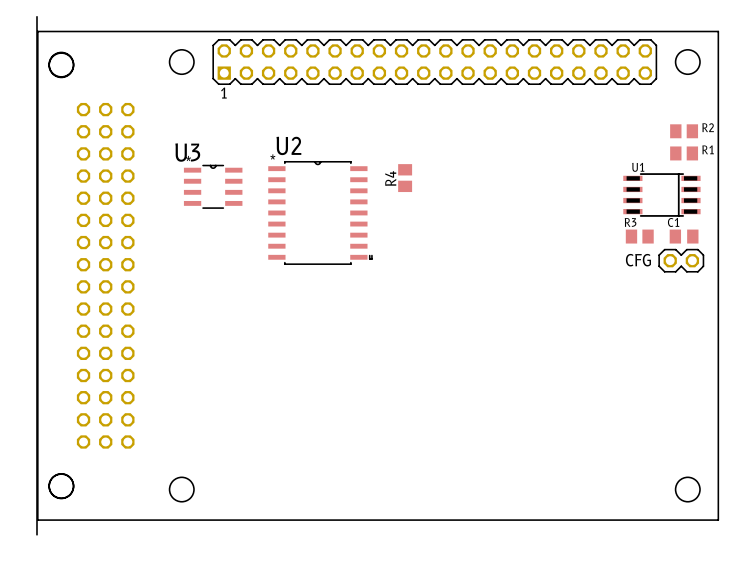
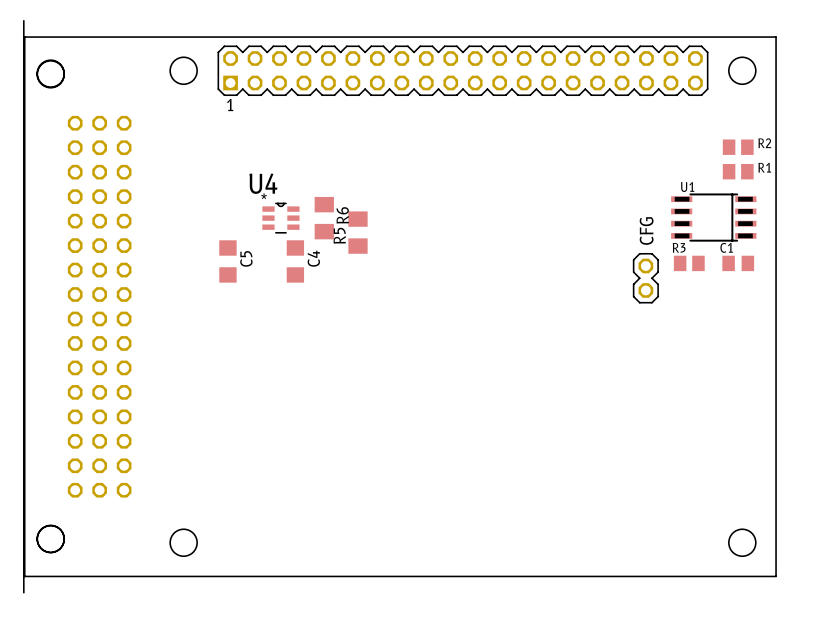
R4: (405, 178) -> none
U3: (213, 186) -> none
U4: none -> (280, 218)
R6: none -> (324, 218)
R5: none -> (358, 232)
U2: (320, 212) -> none
C5: none -> (227, 261)
C4: none -> (295, 261)
CFG rotation: 0° (681, 260) -> 90° clockwise (645, 278)
CFG position: (681, 260) -> (645, 278)

